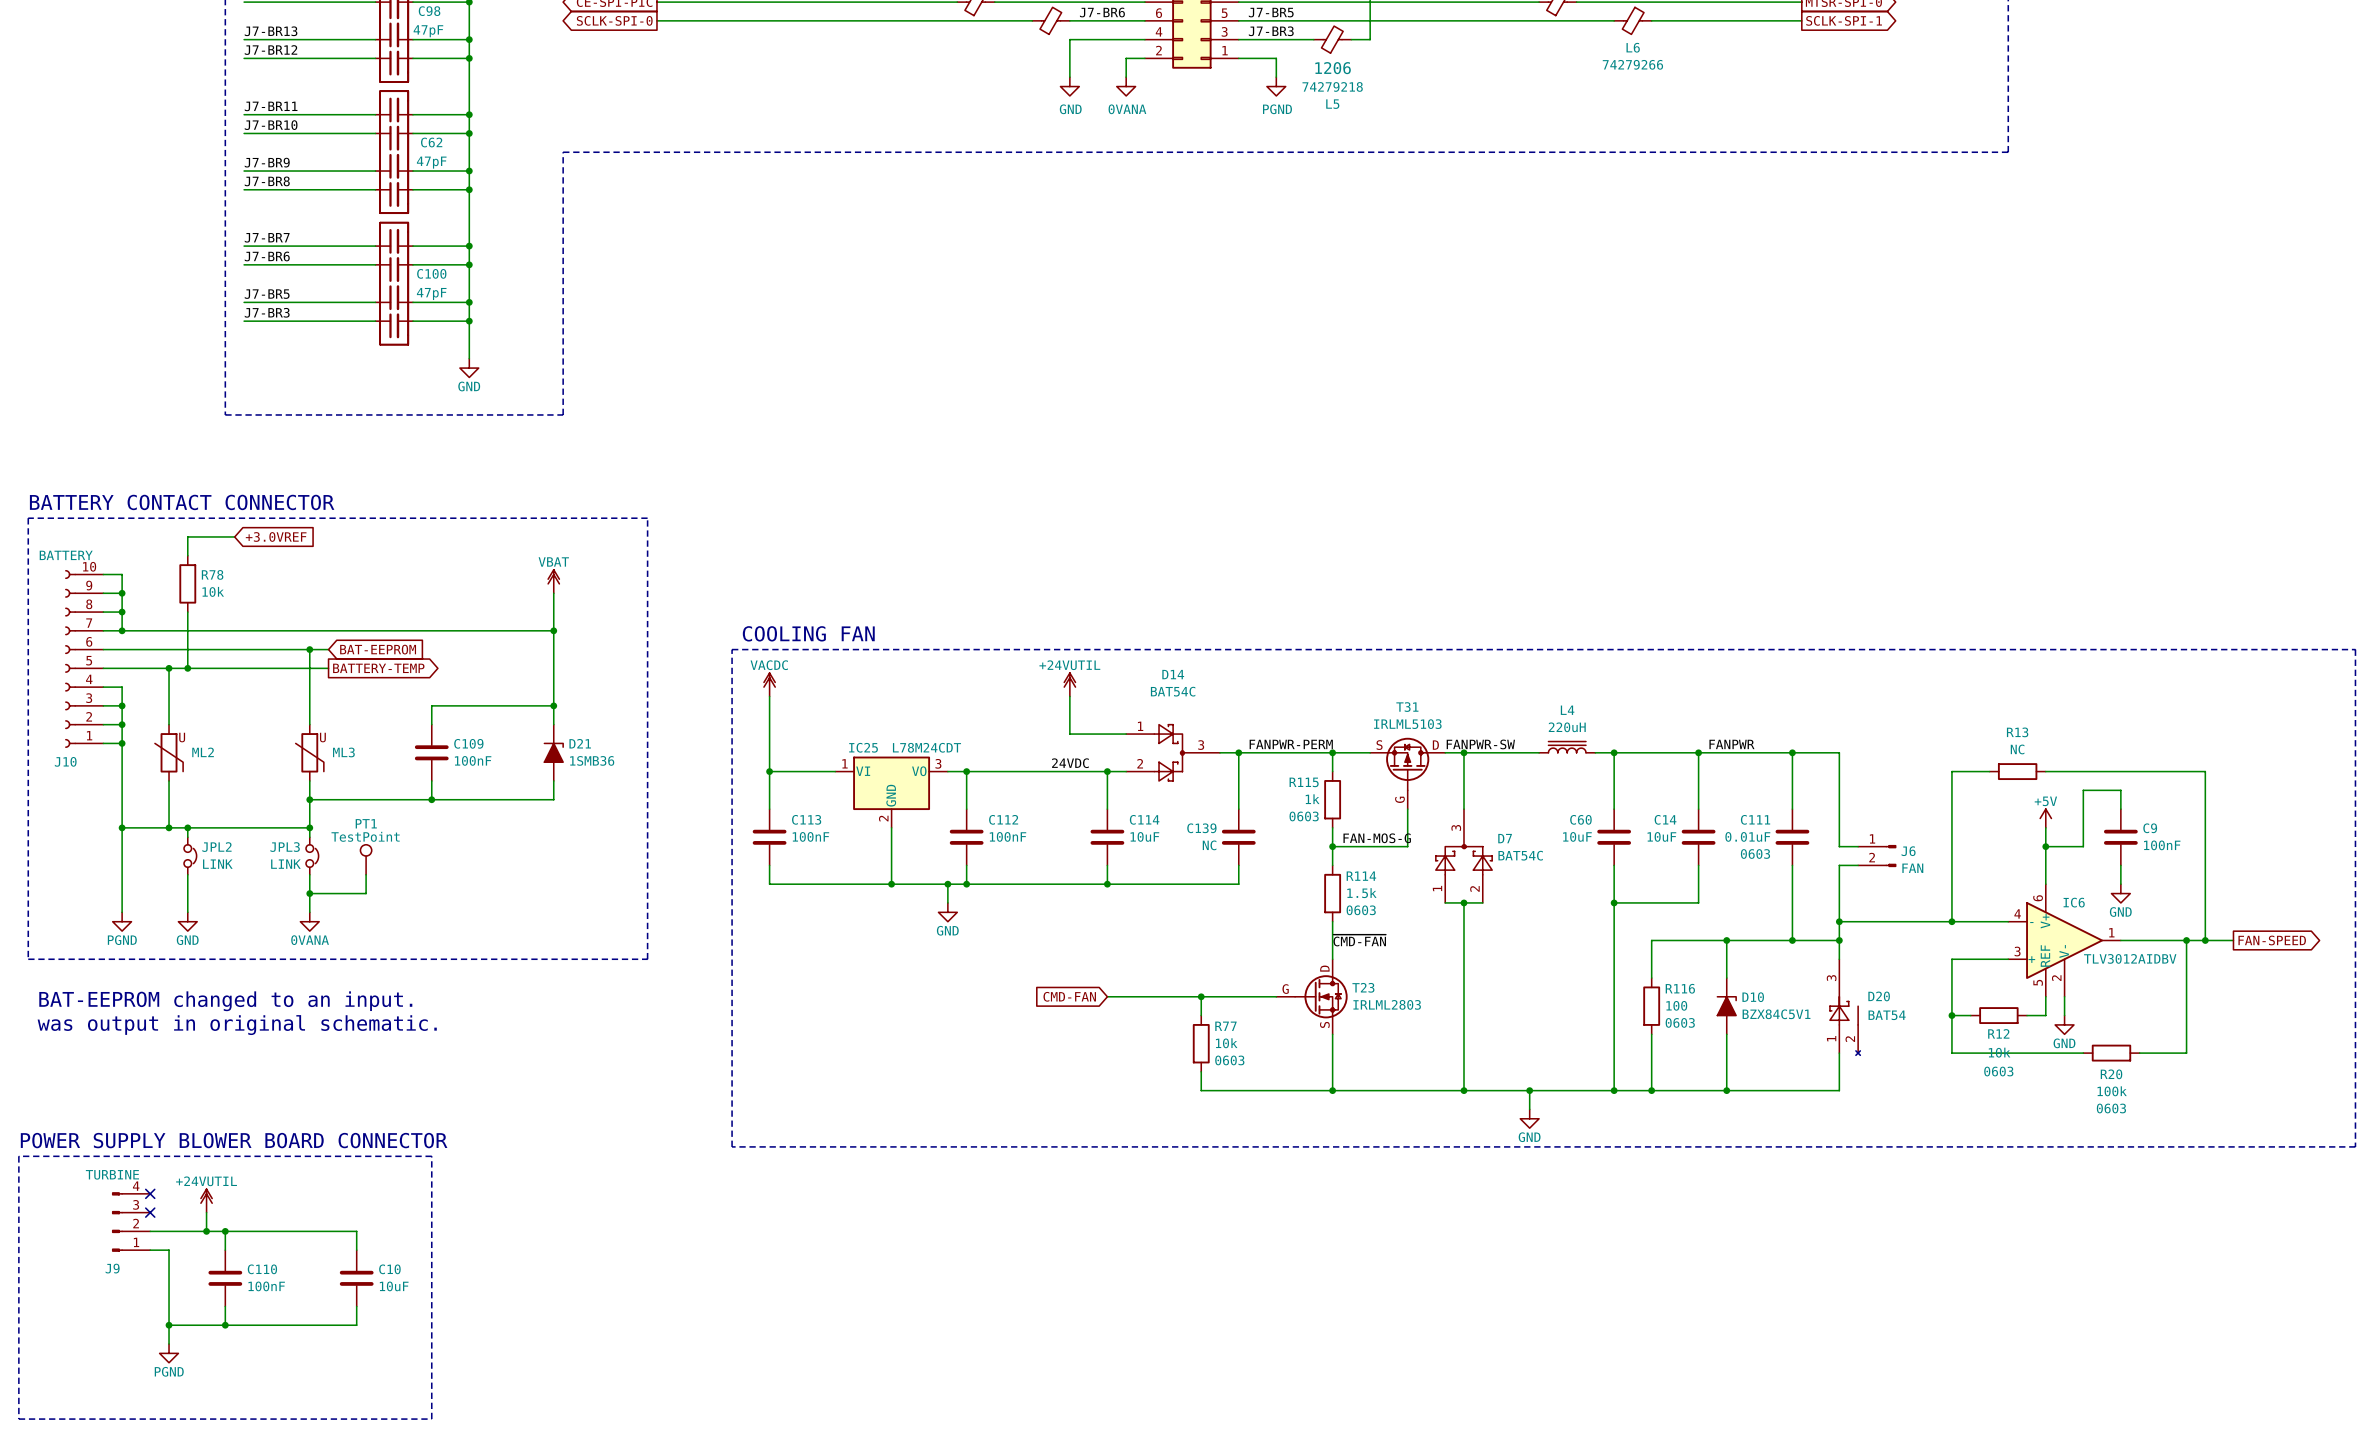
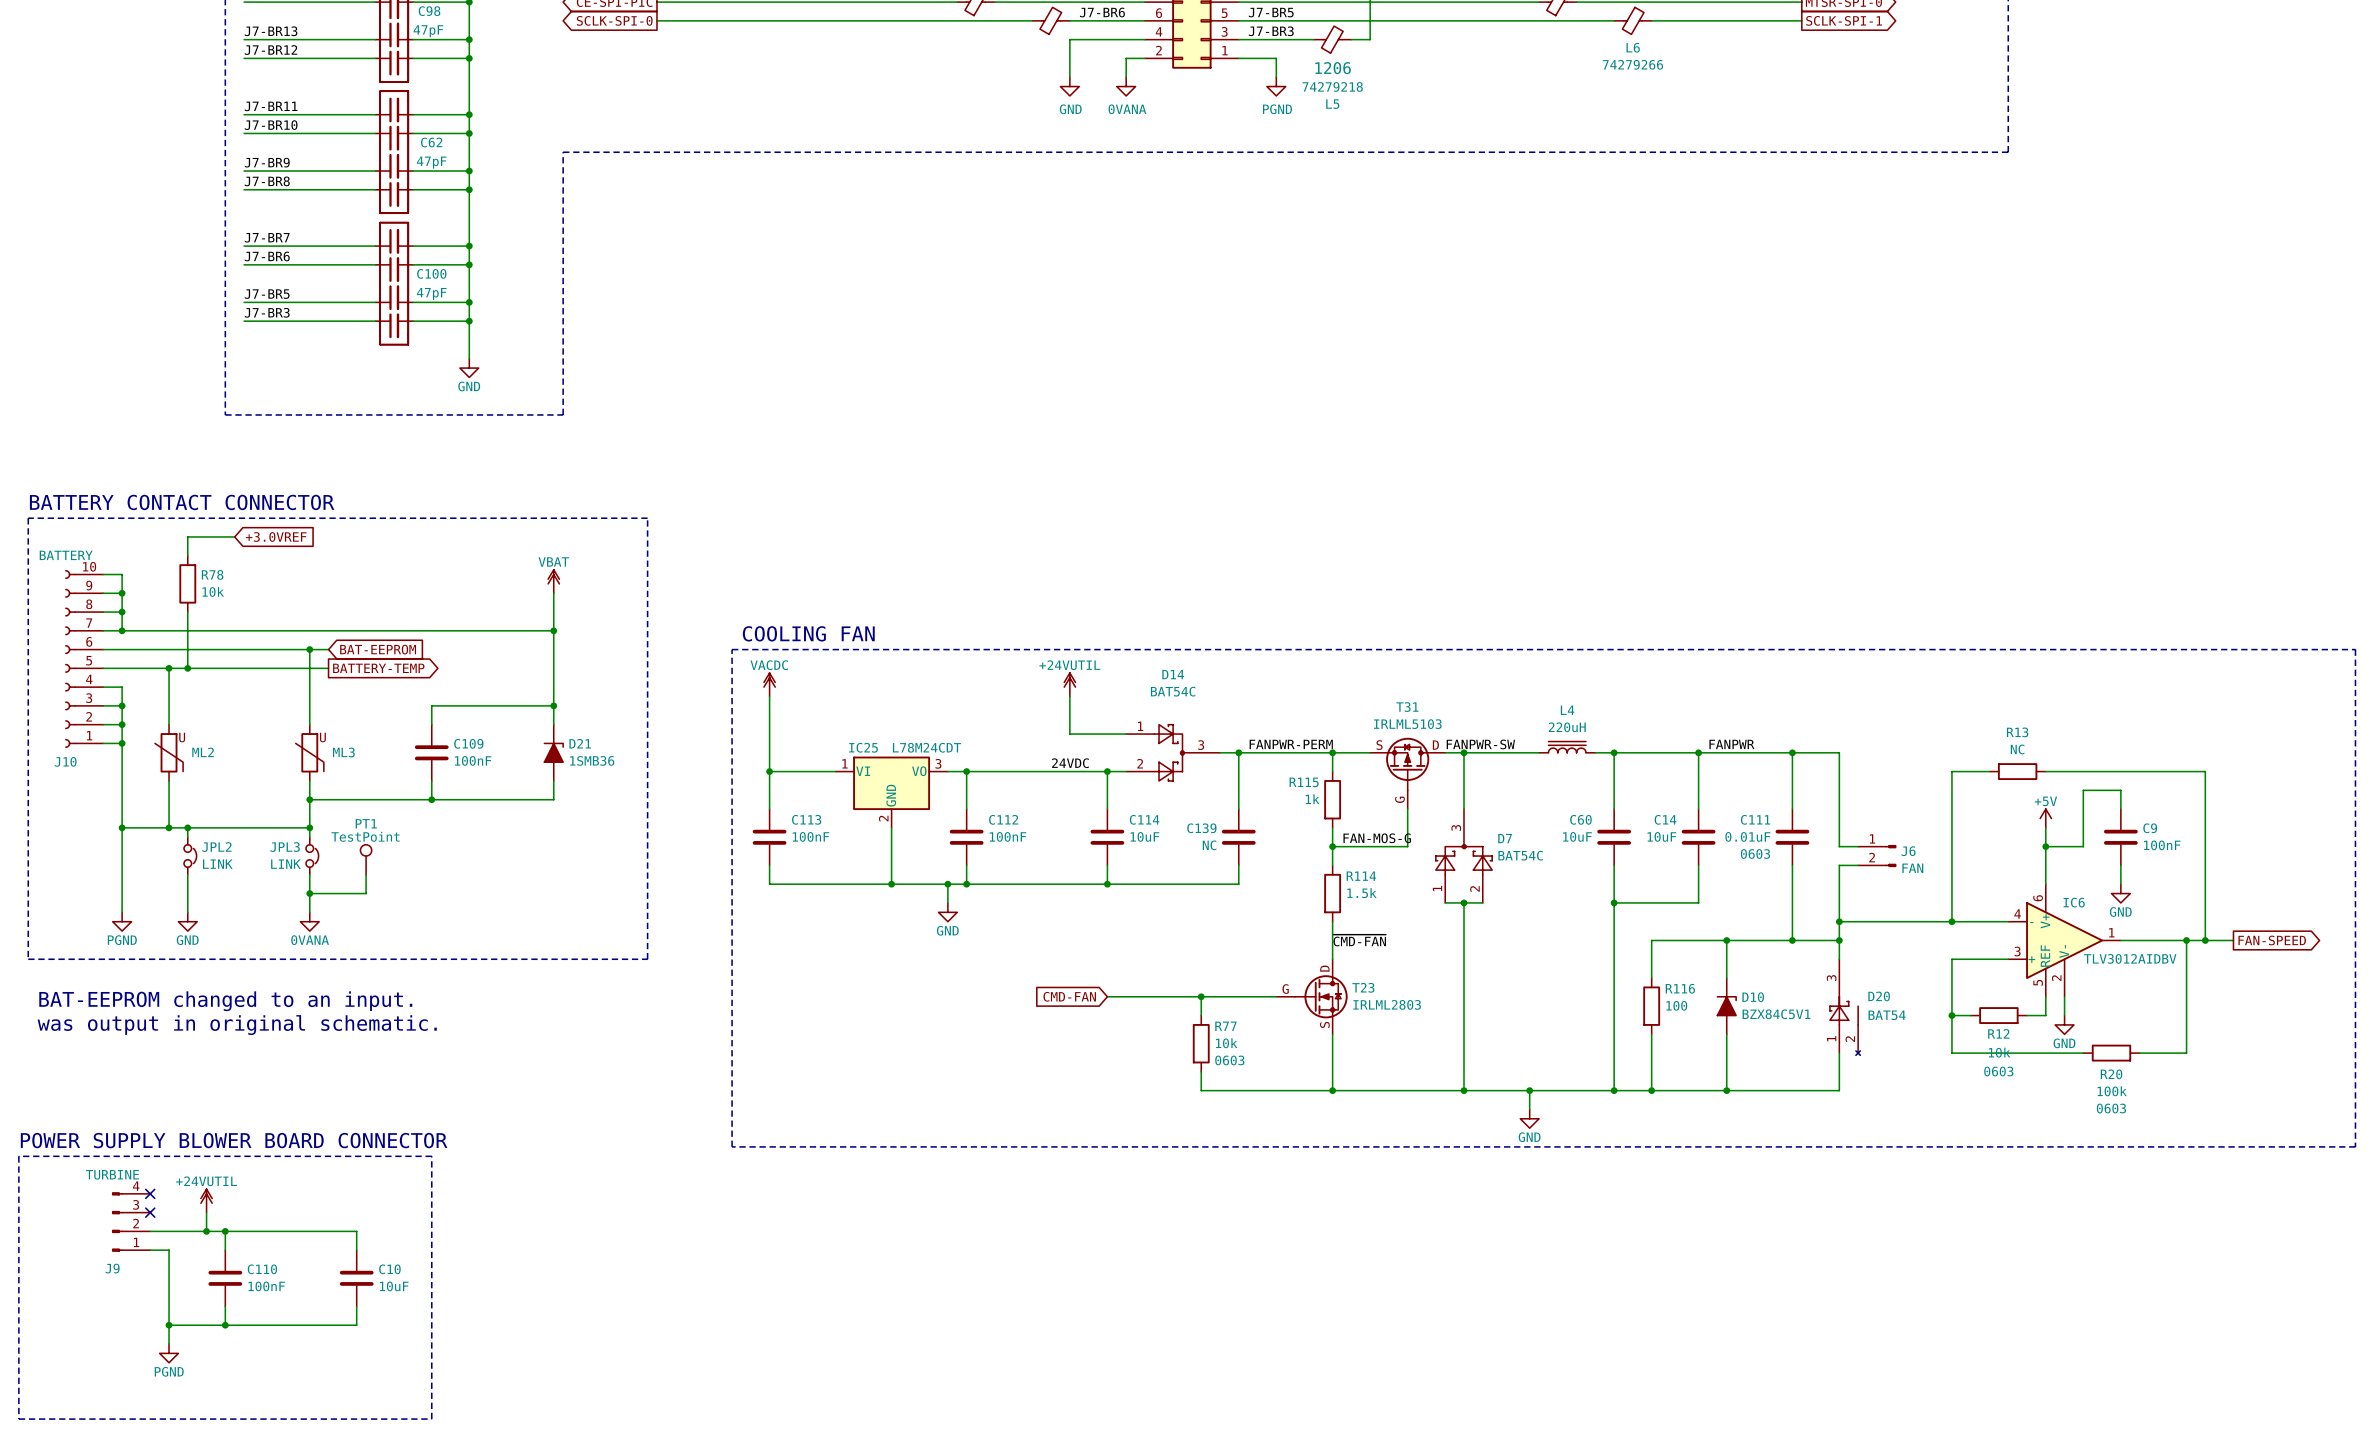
R115 text: 0603 (1304, 816) -> none
R114 text: 0603 (1361, 910) -> none
R116 text: 0603 (1680, 1022) -> none

